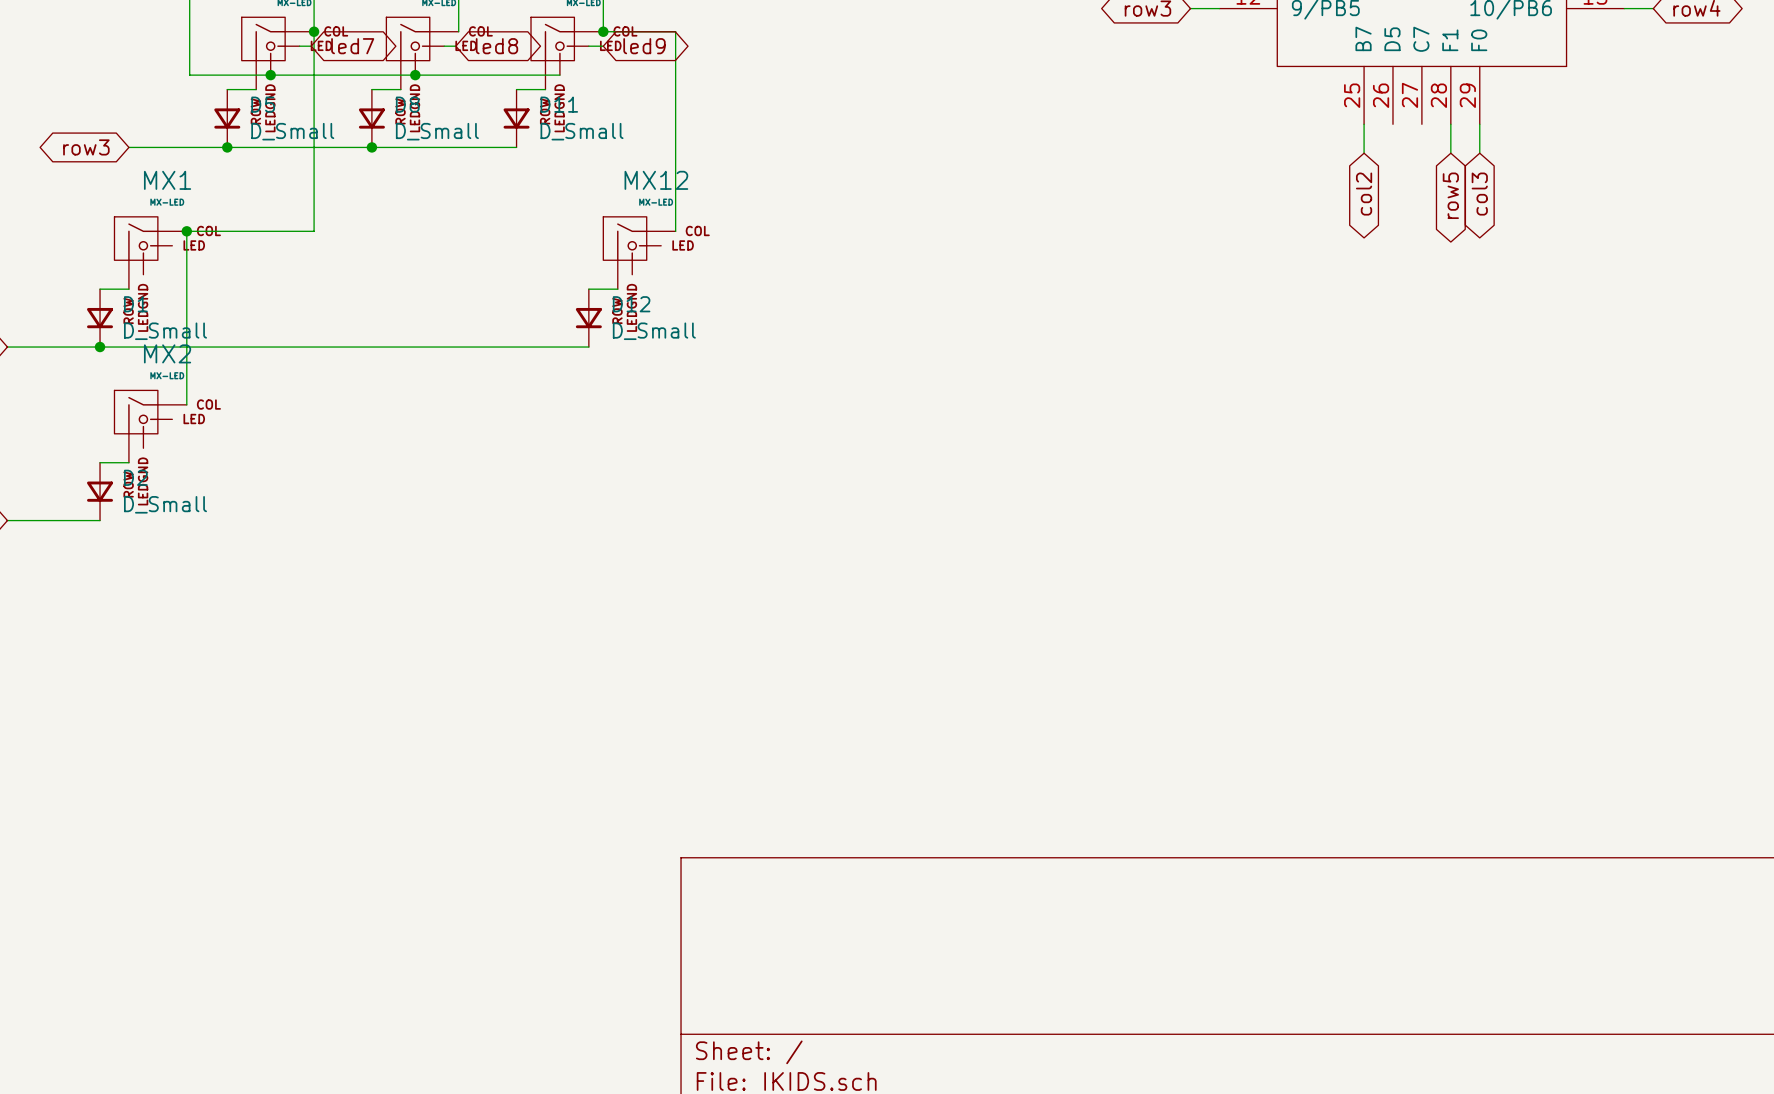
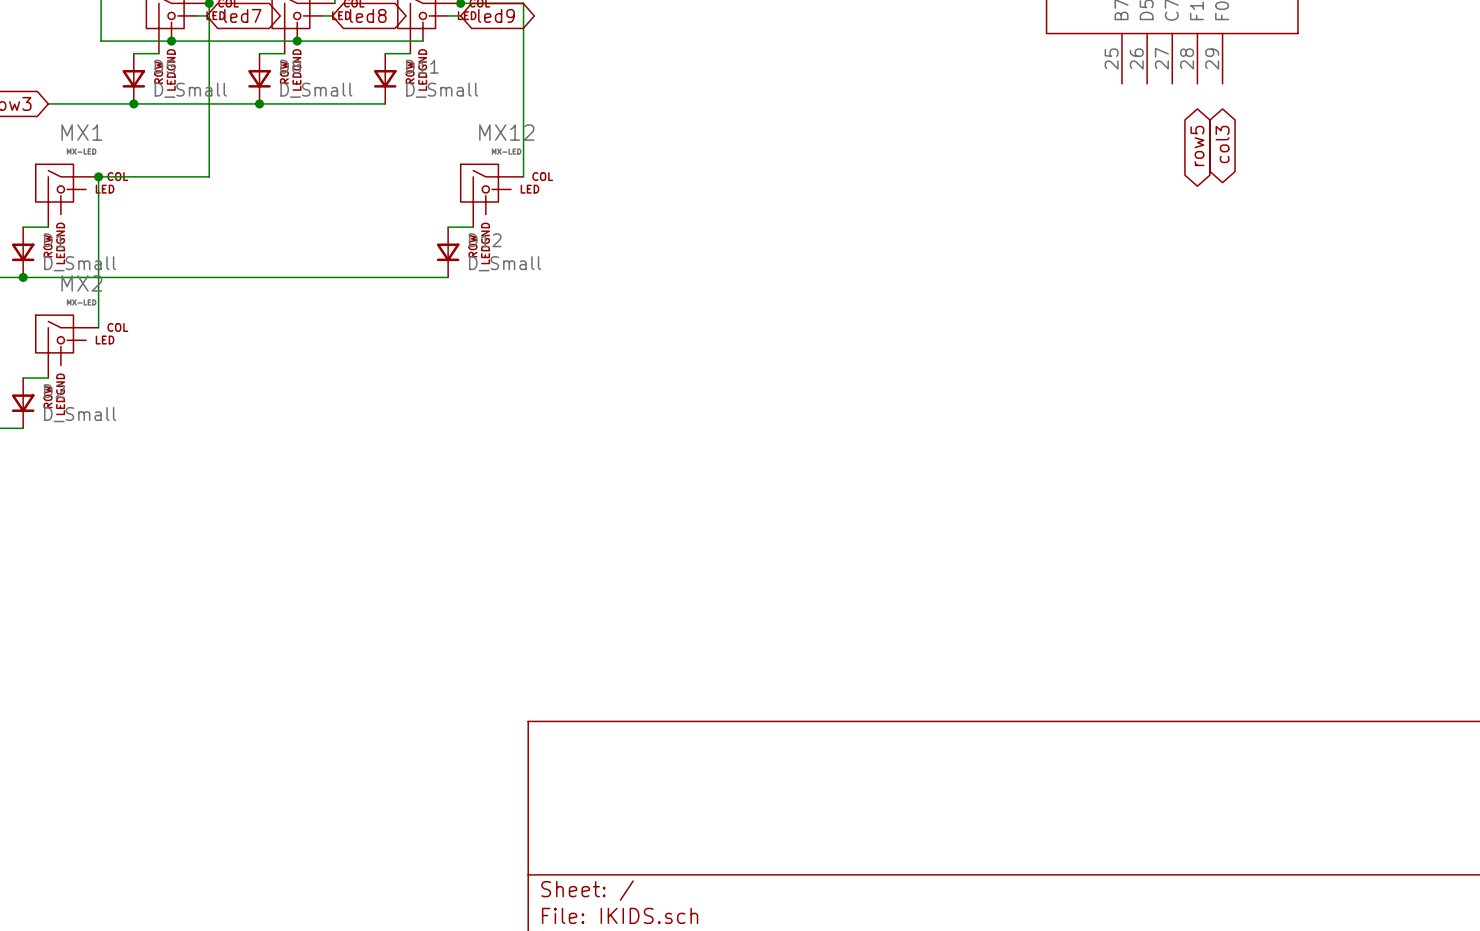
wire: (1364, 124) (1364, 153) -> none
wire: (1450, 124) (1450, 153) -> none
wire: (1479, 124) (1479, 153) -> none
global label: col2 (1364, 194) -> none

